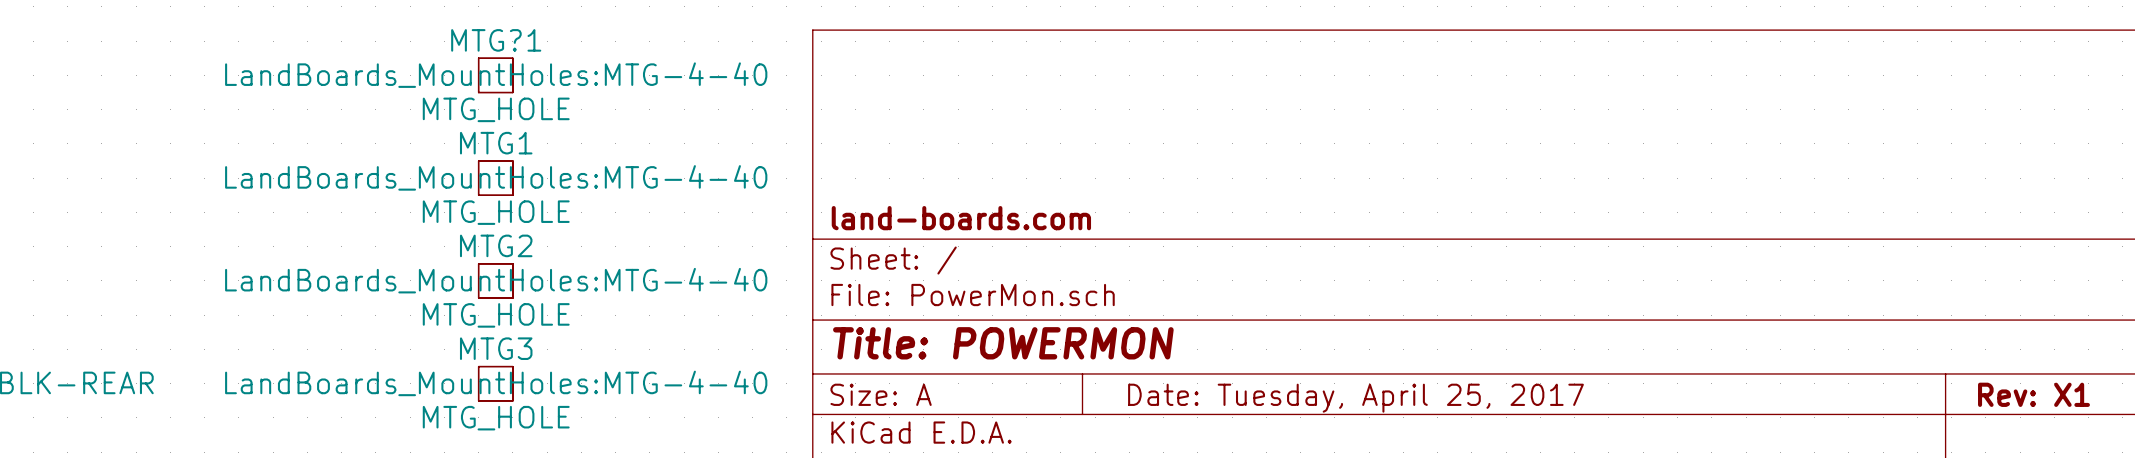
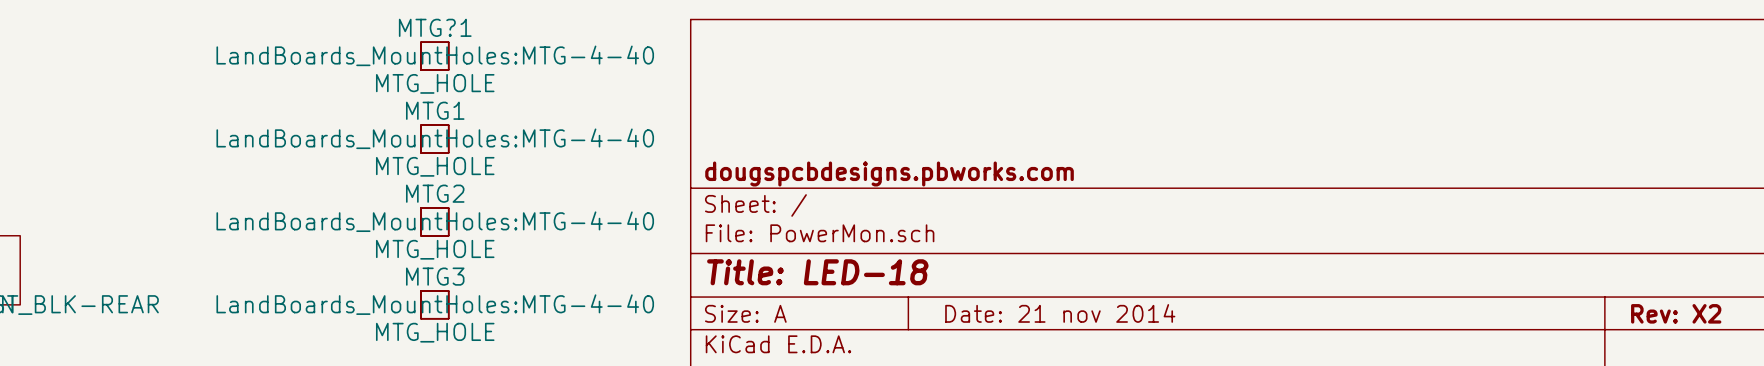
title block: land-boards.com (961, 218) -> dougspcbdesigns.pbworks.com (889, 173)
title block: Title: POWERMON (1003, 343) -> Title: LED-18 (817, 272)
title block: Rev: X1 (2033, 394) -> Rev: X2 (1676, 313)
title block: Date: Tuesday, April 25, 2017 (1355, 398) -> Date: 21 nov 2014 (1060, 313)

